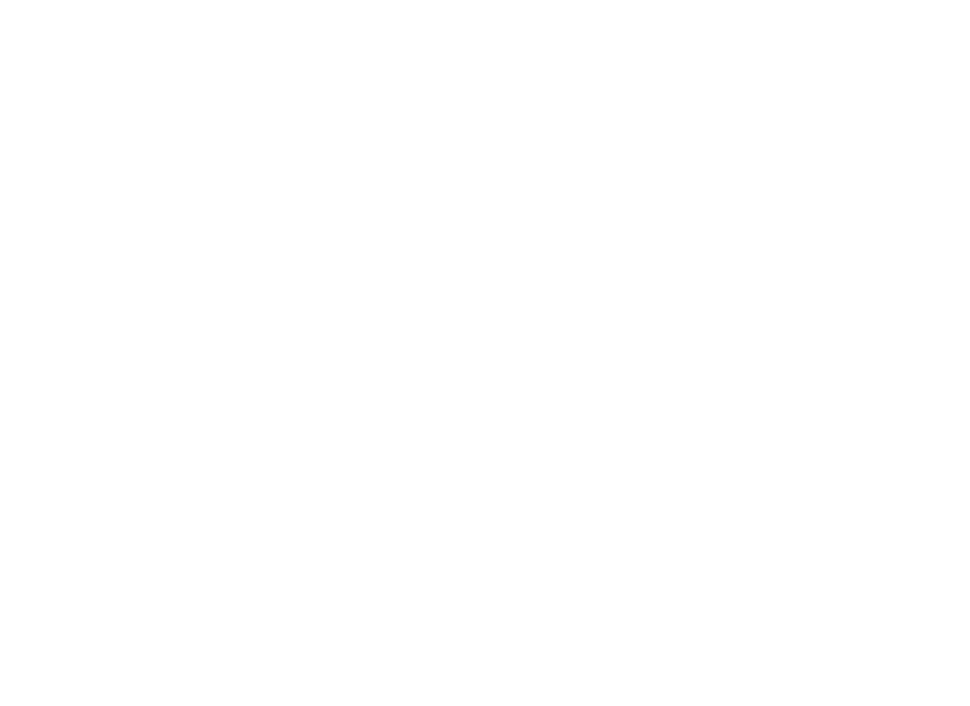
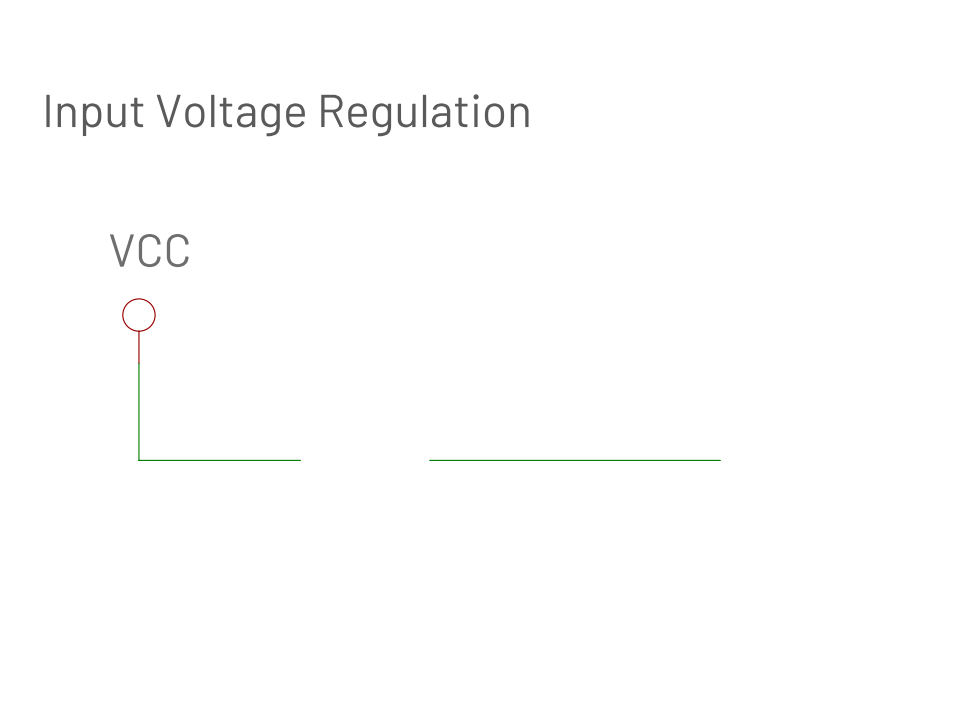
text: none -> Input Voltage Regulation (287, 115)
power symbol: none -> VCC (138, 331)
wire: none -> (138, 363) (138, 460) (300, 460)
wire: none -> (429, 460) (720, 460)

